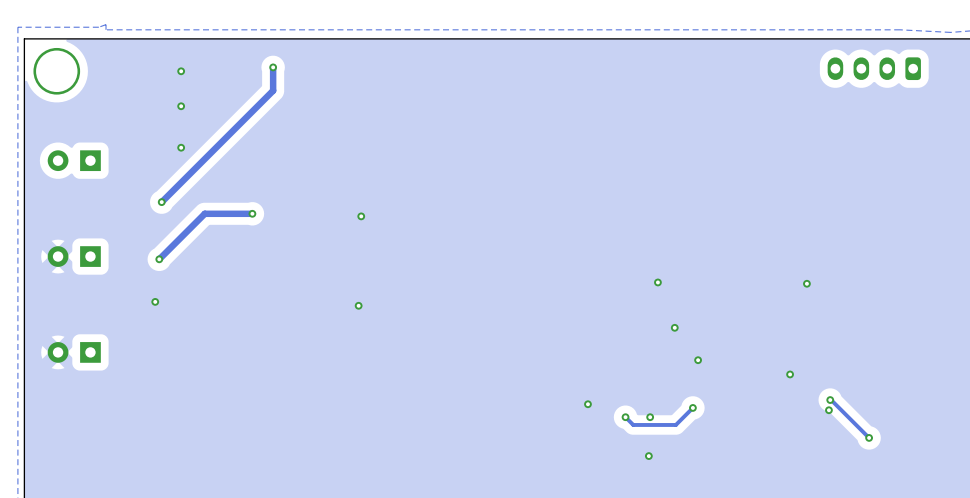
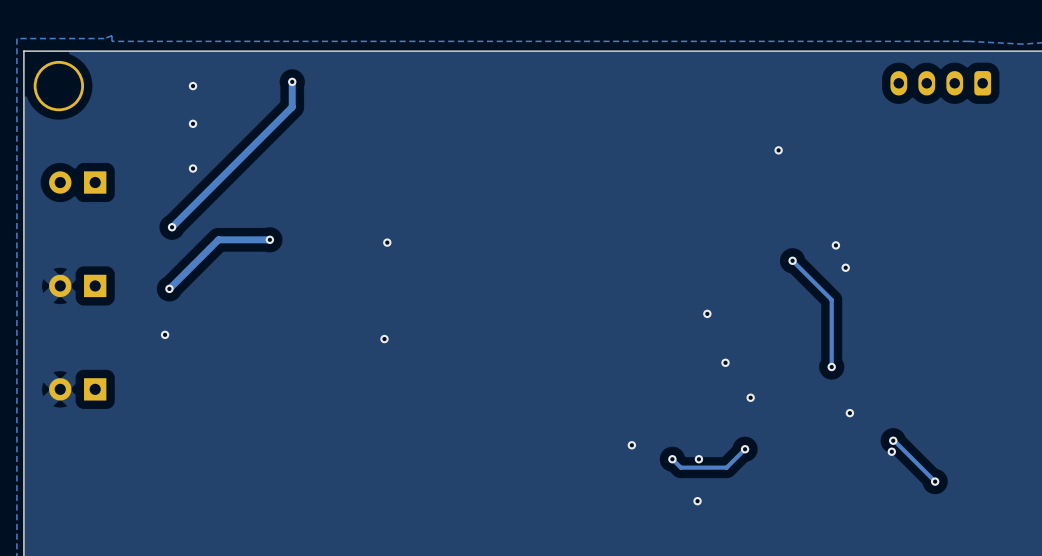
via: none -> (778, 150)
via: none -> (835, 245)
track: none -> (792, 260) (831, 299) (831, 367)
via: none -> (792, 260)
via: none -> (845, 267)
via: (806, 283) -> none
via: none -> (831, 367)

